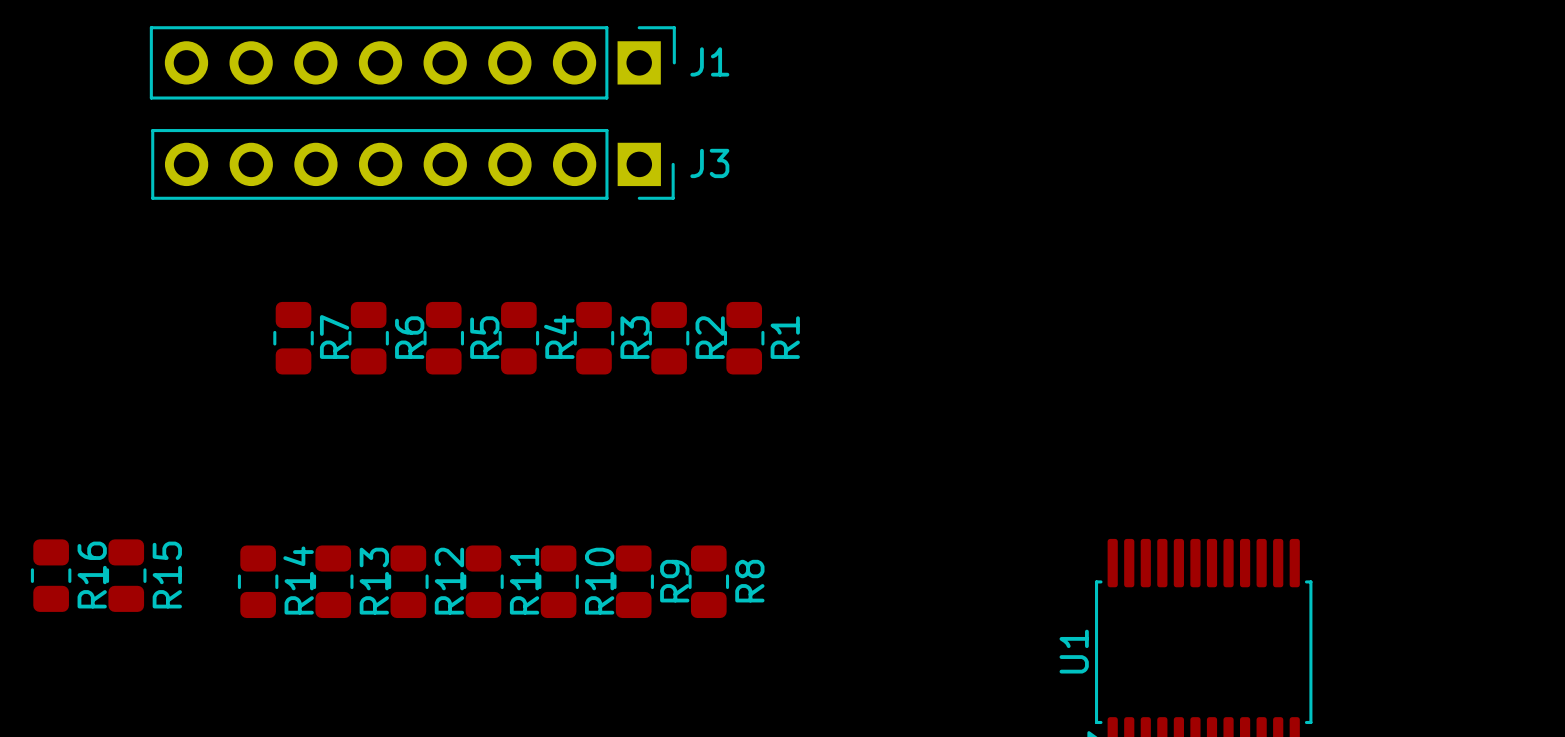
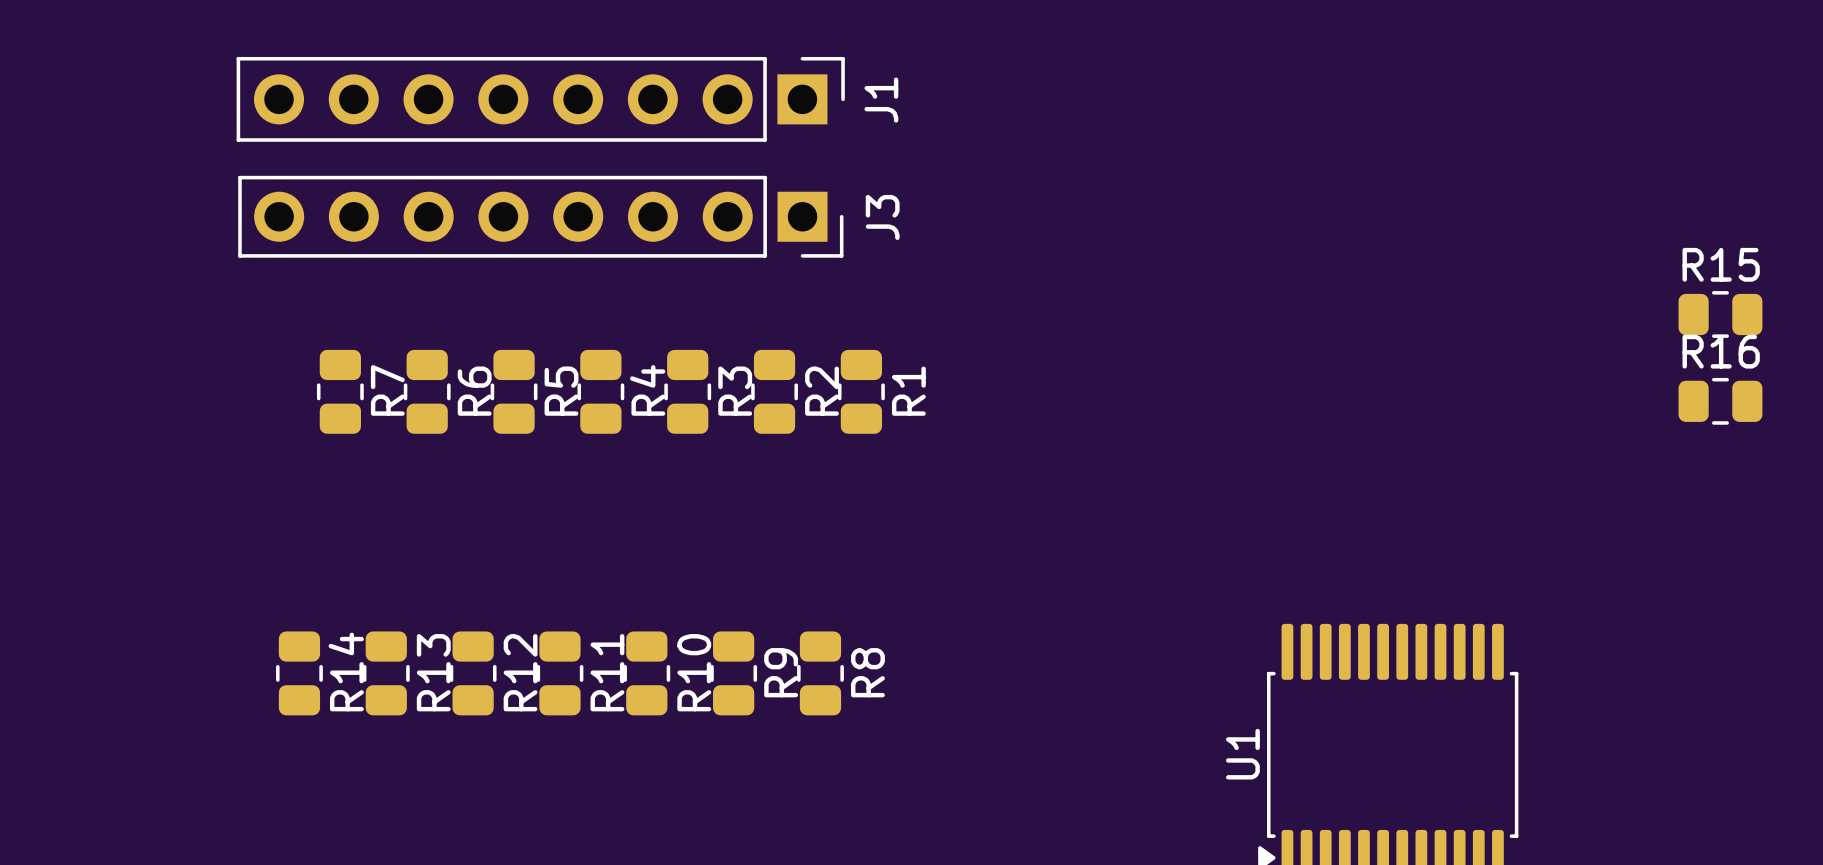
J1 name rotation: 0° (709, 61) -> 90° counterclockwise (881, 100)
J1 position: (412, 62) -> (540, 99)
J3 name rotation: 0° (709, 163) -> 90° counterclockwise (882, 217)
J3 position: (412, 164) -> (540, 216)
R16 rotation: 0° (51, 575) -> 90° clockwise (1720, 401)
R16 position: (51, 575) -> (1720, 401)
R16 name position: R16 (92, 575) -> R16 (1721, 351)
R15 rotation: 0° (126, 575) -> 90° clockwise (1720, 314)
R15 position: (126, 575) -> (1720, 314)
R15 name position: R15 (167, 575) -> R15 (1721, 264)

